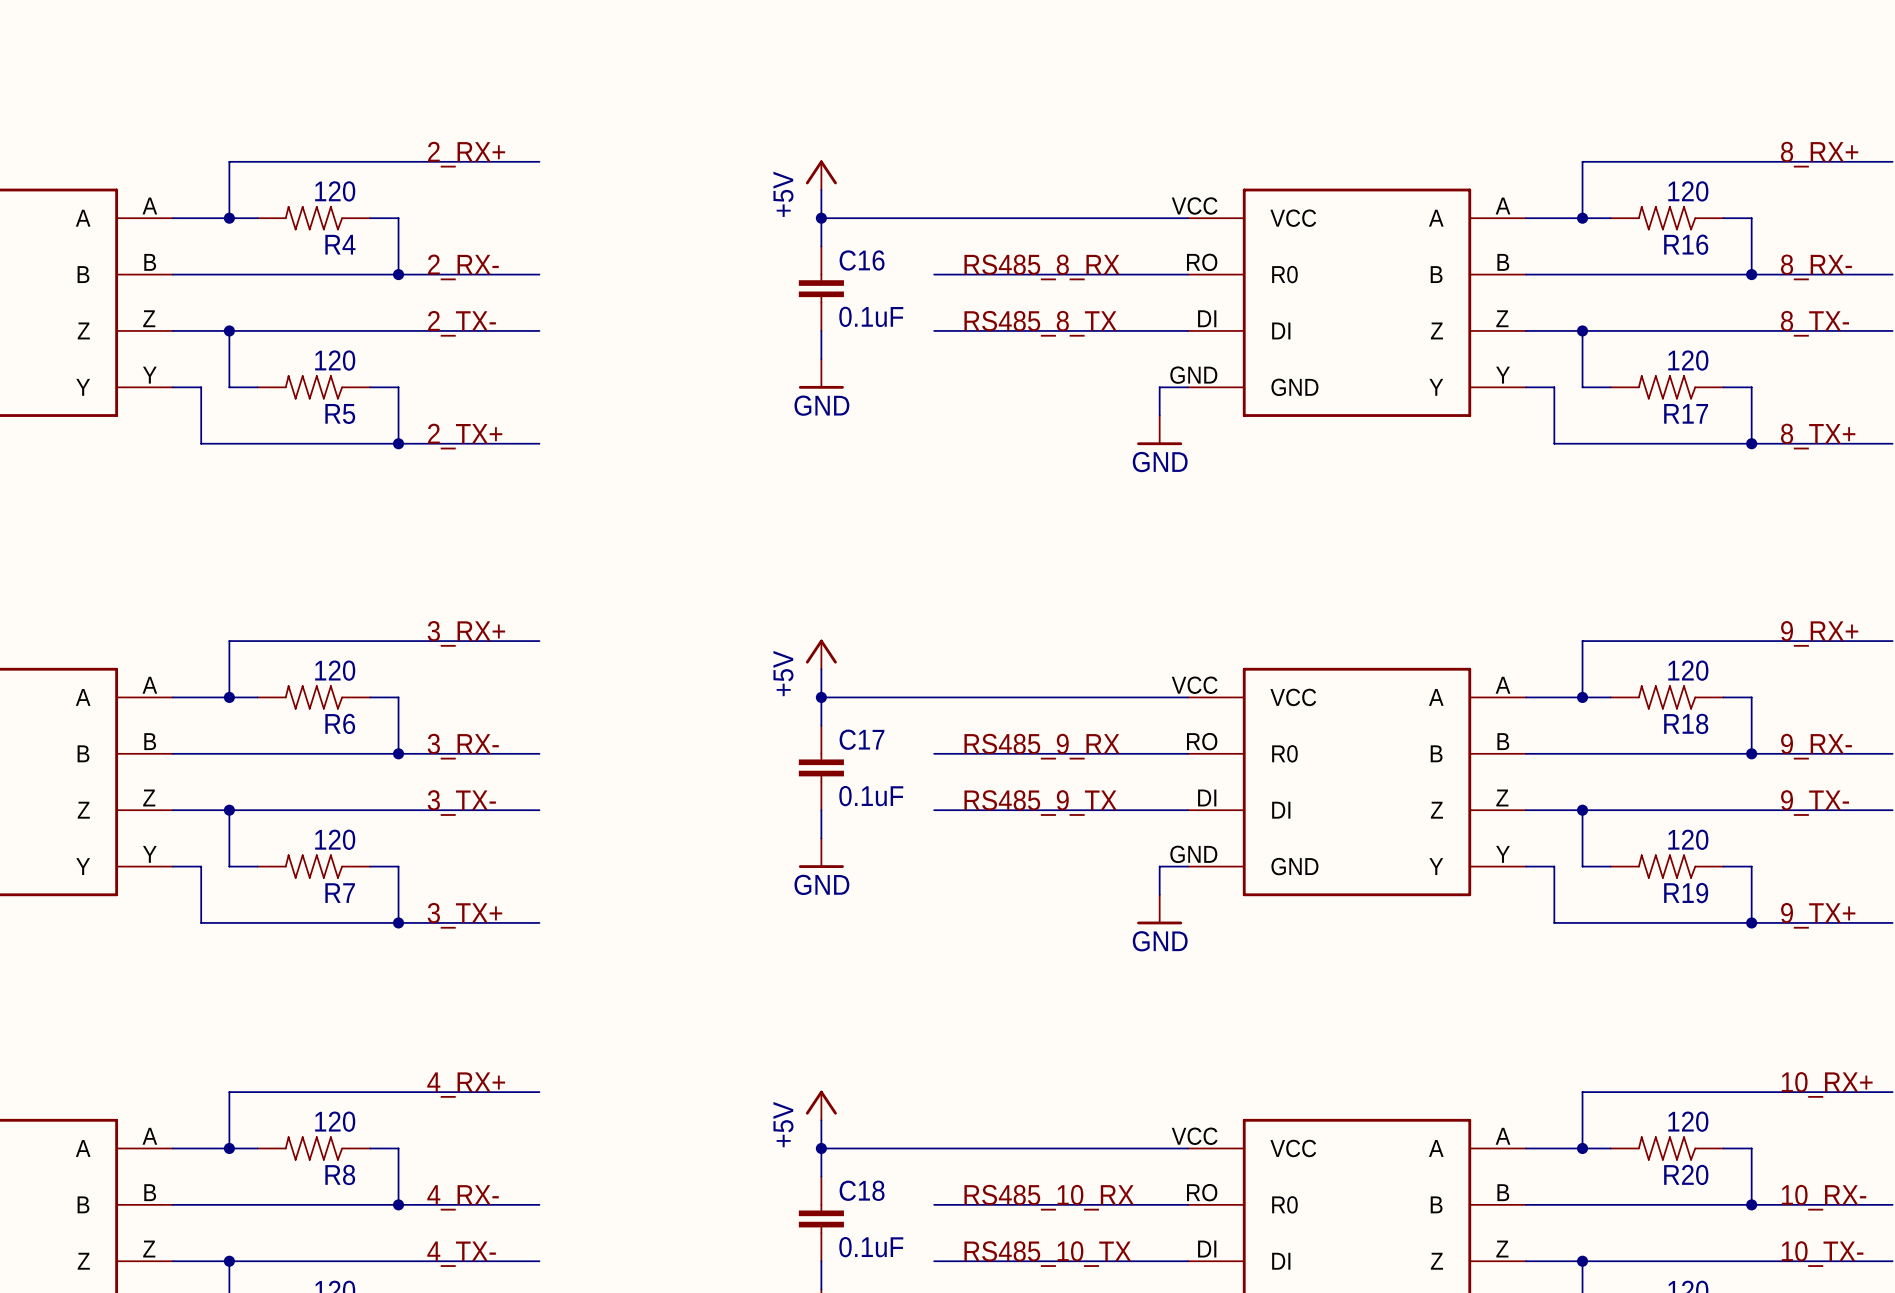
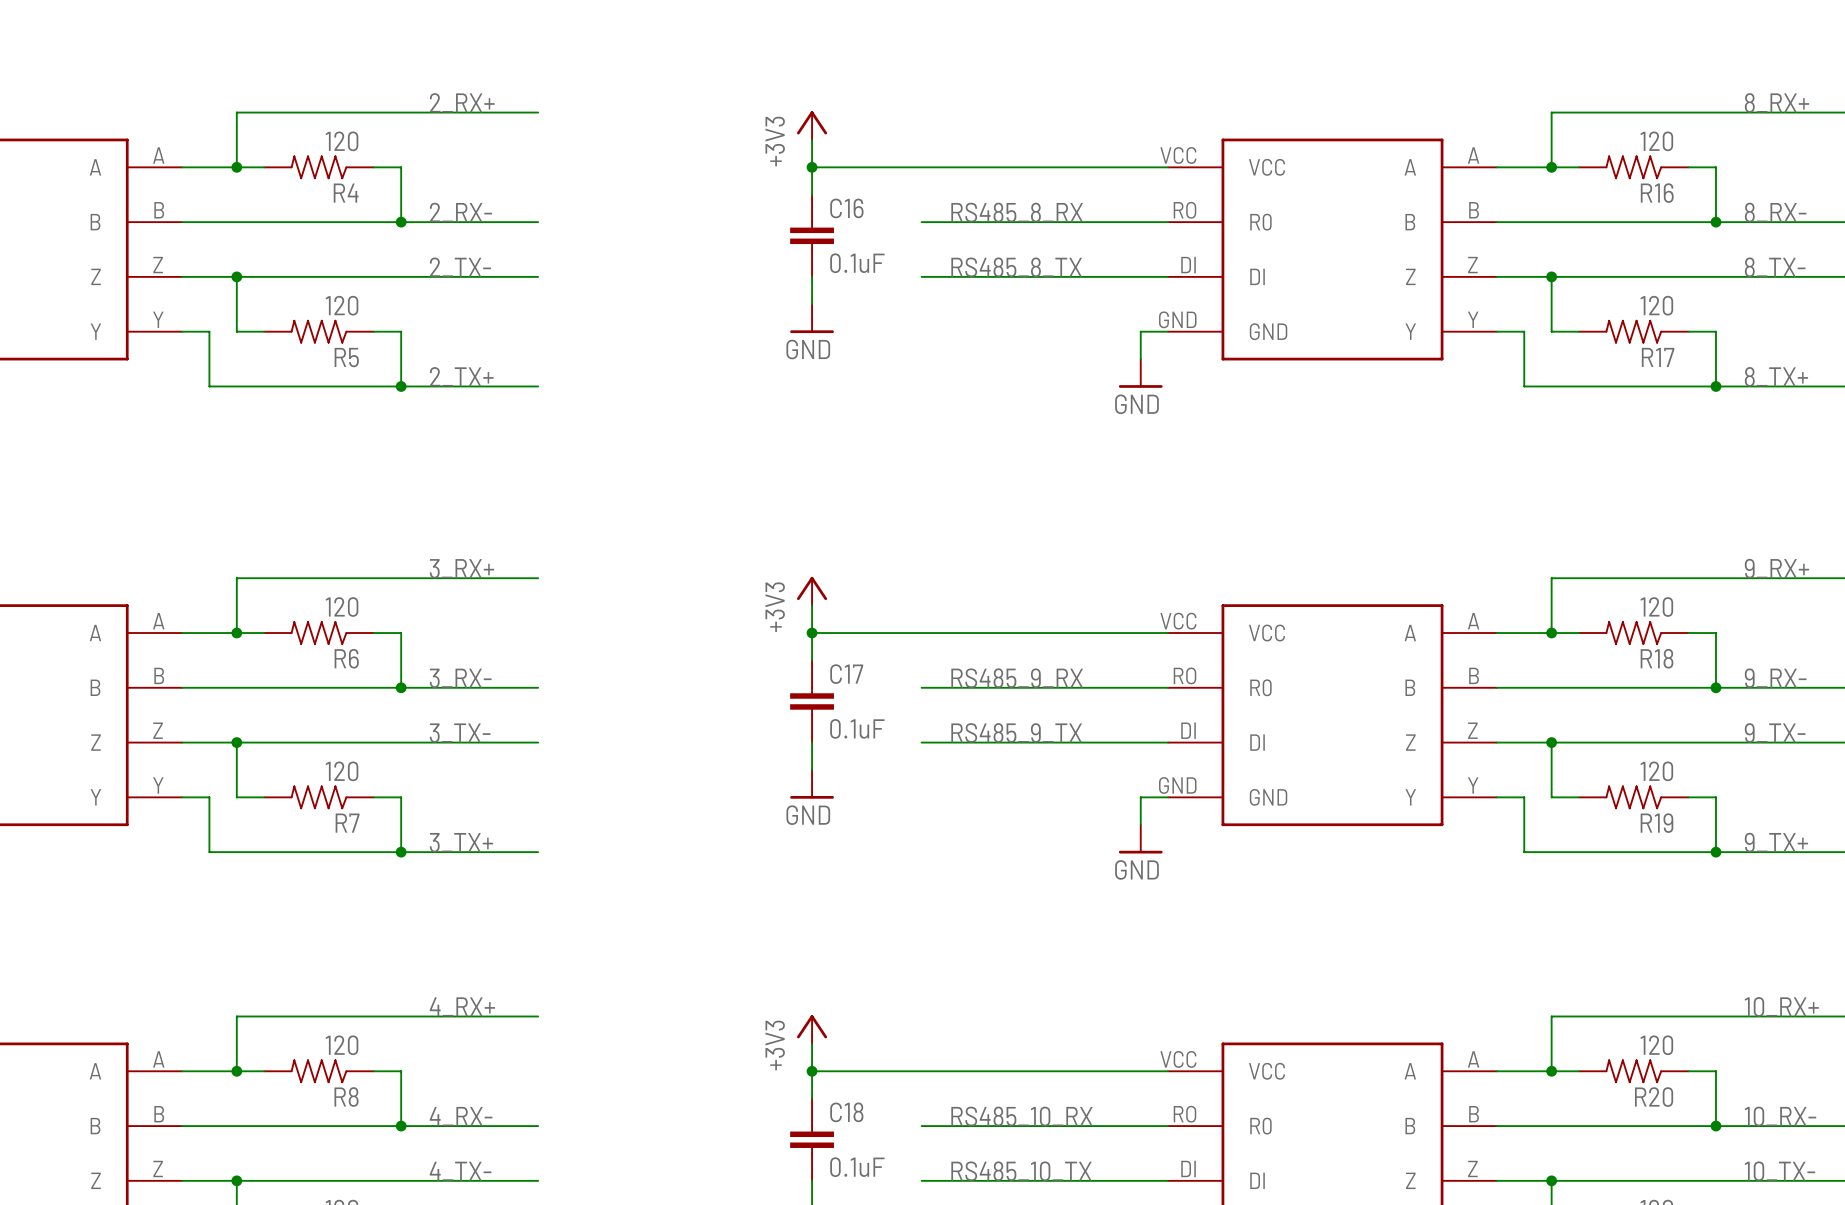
power symbol: +5V (821, 175) -> +3V3 (812, 125)
power symbol: +5V (821, 654) -> +3V3 (812, 591)
power symbol: +5V (821, 1105) -> +3V3 (812, 1029)

